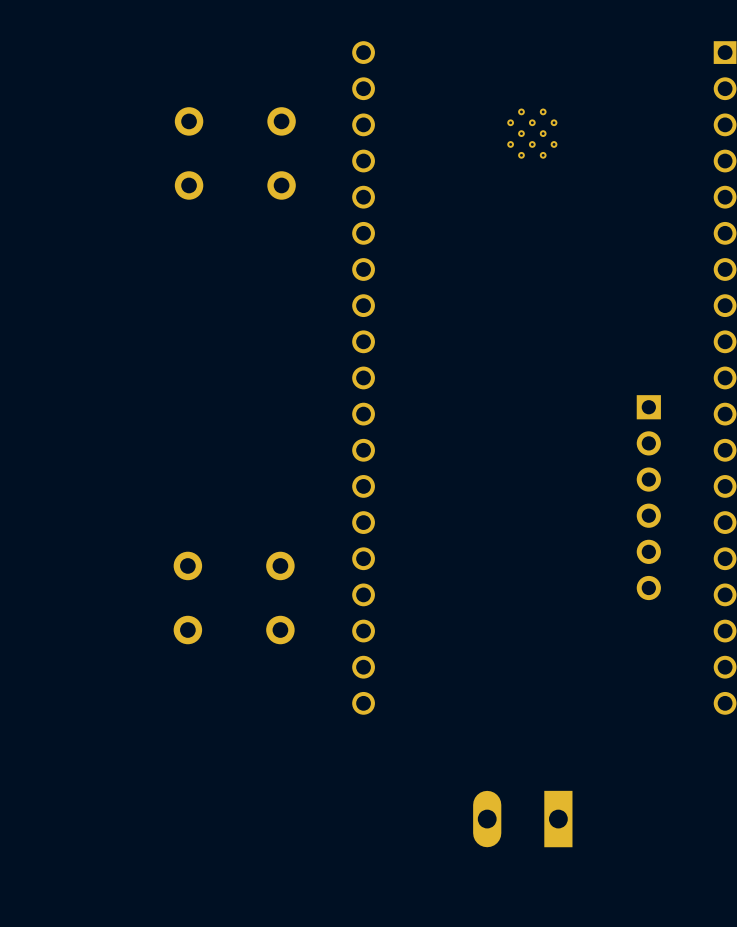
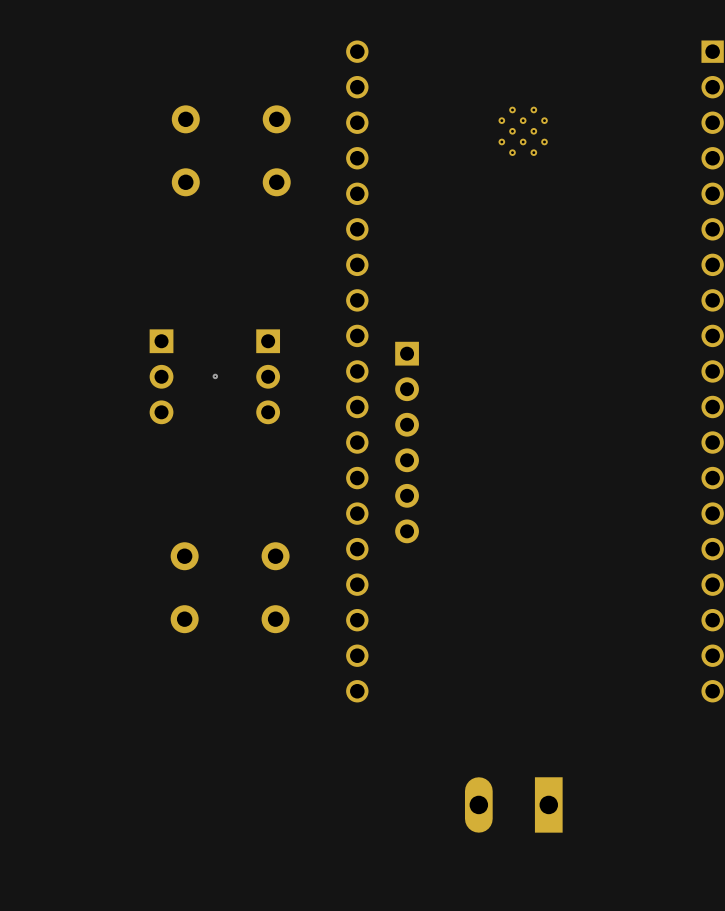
part: none -> (161, 376)
part: none -> (215, 376)
part: none -> (268, 376)
part position: (648, 497) -> (407, 442)

